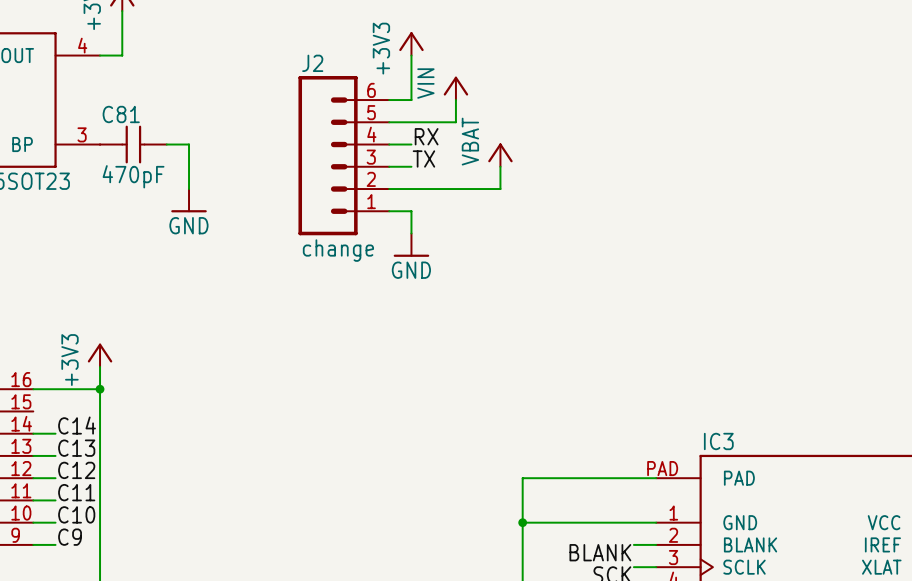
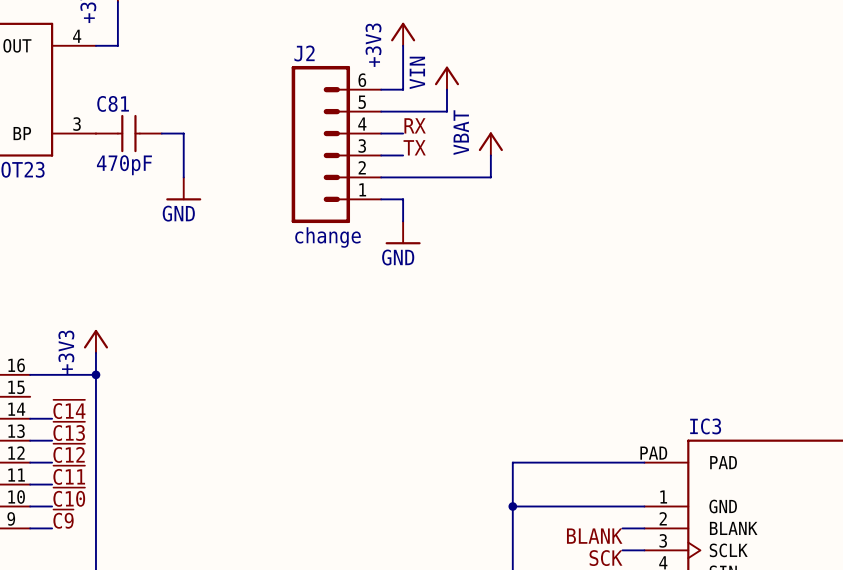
label: C14 (77, 425) -> ~{C14} (69, 409)
label: C13 (76, 448) -> ~{C13} (69, 431)
label: C12 (76, 470) -> ~{C12} (69, 453)
label: C11 (76, 492) -> ~{C11} (69, 475)
label: C10 (76, 514) -> ~{C10} (69, 497)
label: C9 (70, 537) -> ~{C9} (63, 519)

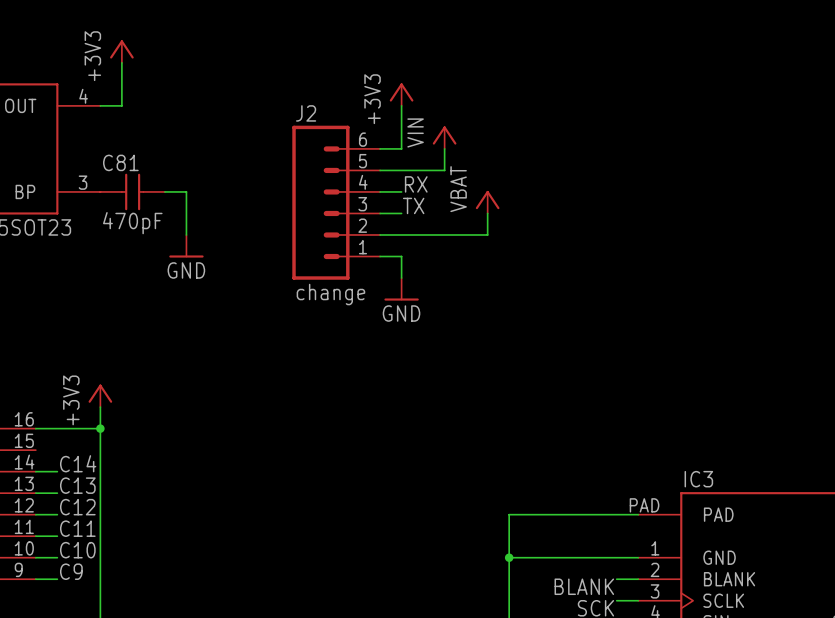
label: ~{C14} (69, 409) -> C14 (78, 463)
label: ~{C13} (69, 431) -> C13 (77, 485)
label: ~{C12} (69, 453) -> C12 (77, 507)
label: ~{C11} (69, 475) -> C11 (77, 528)
label: ~{C10} (69, 497) -> C10 (77, 550)
label: ~{C9} (63, 519) -> C9 (71, 571)

